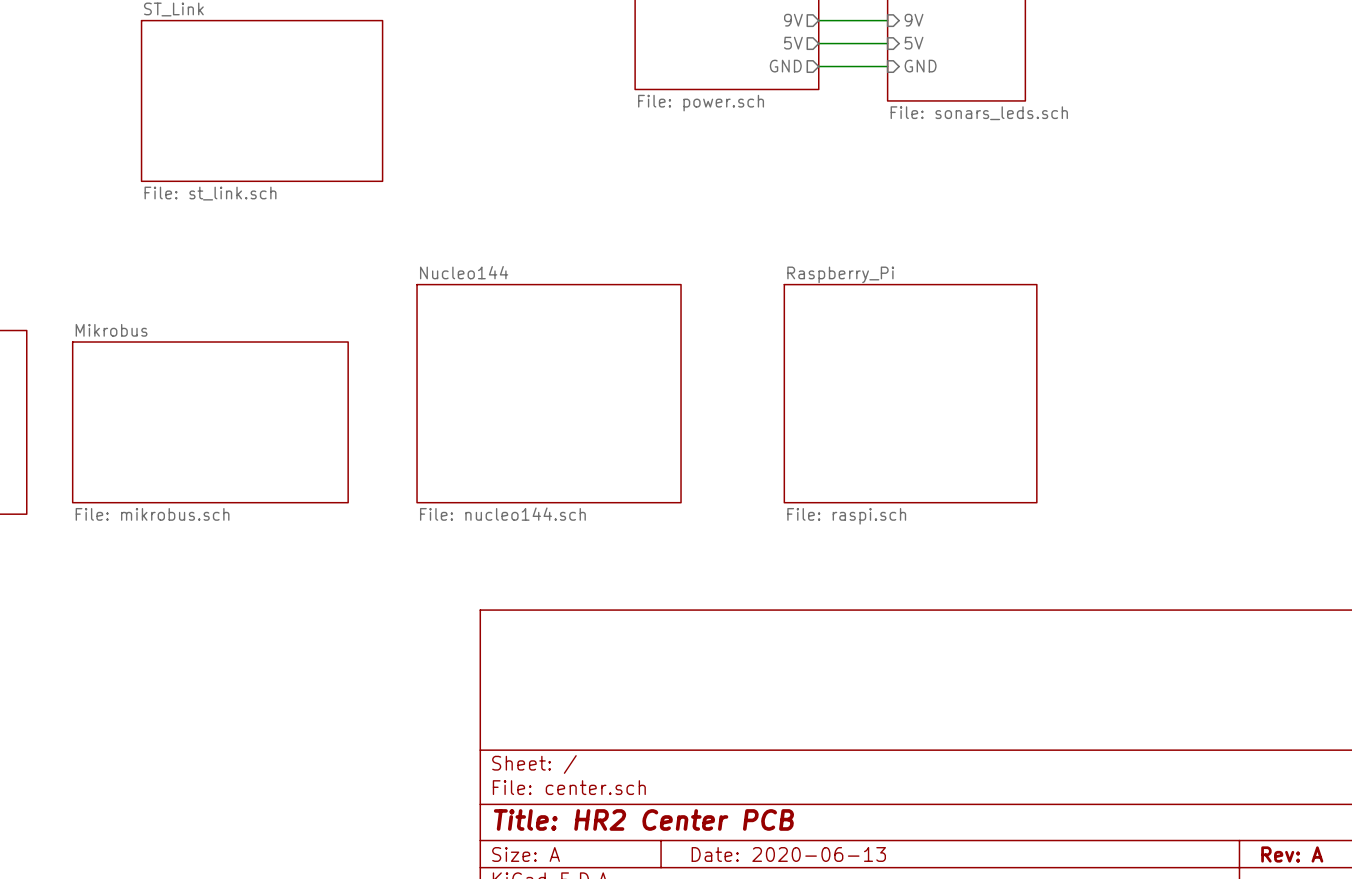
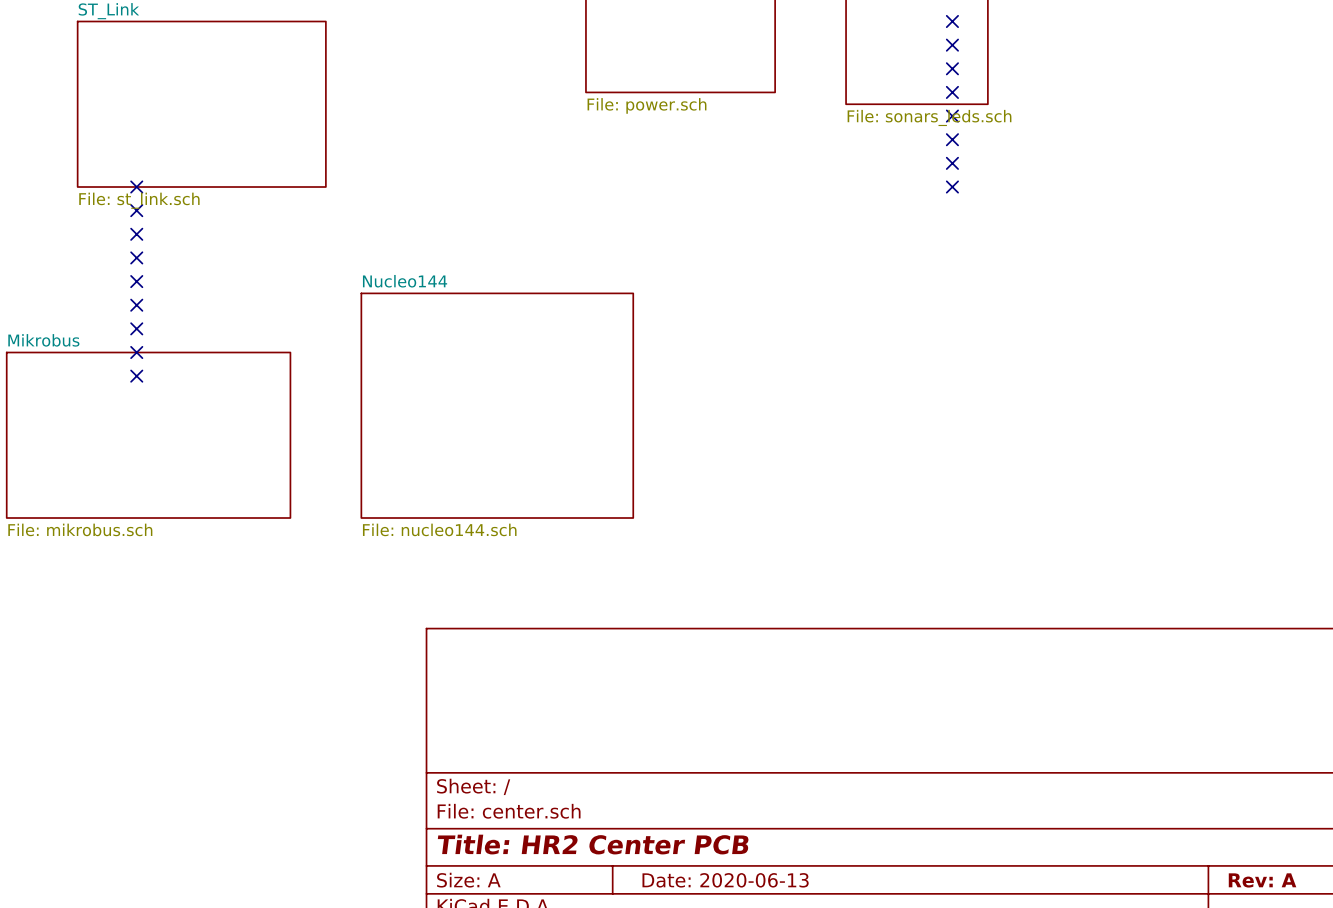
sheet pin: 9V (793, 20) -> none
wire: (818, 20) (887, 20) -> none
sheet pin: 9V (914, 20) -> none
no-connect mark: none -> (952, 21)
sheet pin: 5V (793, 43) -> none
wire: (818, 43) (887, 43) -> none
sheet pin: 5V (914, 43) -> none
no-connect mark: none -> (952, 45)
sheet pin: GND (785, 66) -> none
wire: (818, 66) (887, 66) -> none
sheet pin: GND (920, 66) -> none
no-connect mark: none -> (952, 68)
no-connect mark: none -> (952, 92)
no-connect mark: none -> (952, 116)
no-connect mark: none -> (952, 139)
no-connect mark: none -> (952, 163)
no-connect mark: none -> (136, 187)
no-connect mark: none -> (952, 187)
no-connect mark: none -> (136, 210)
no-connect mark: none -> (136, 234)
no-connect mark: none -> (136, 257)
no-connect mark: none -> (136, 281)
no-connect mark: none -> (136, 305)
no-connect mark: none -> (136, 328)
no-connect mark: none -> (136, 352)
no-connect mark: none -> (136, 376)
sheet Raspberry_Pi: File: raspi.sch (910, 393) -> none

